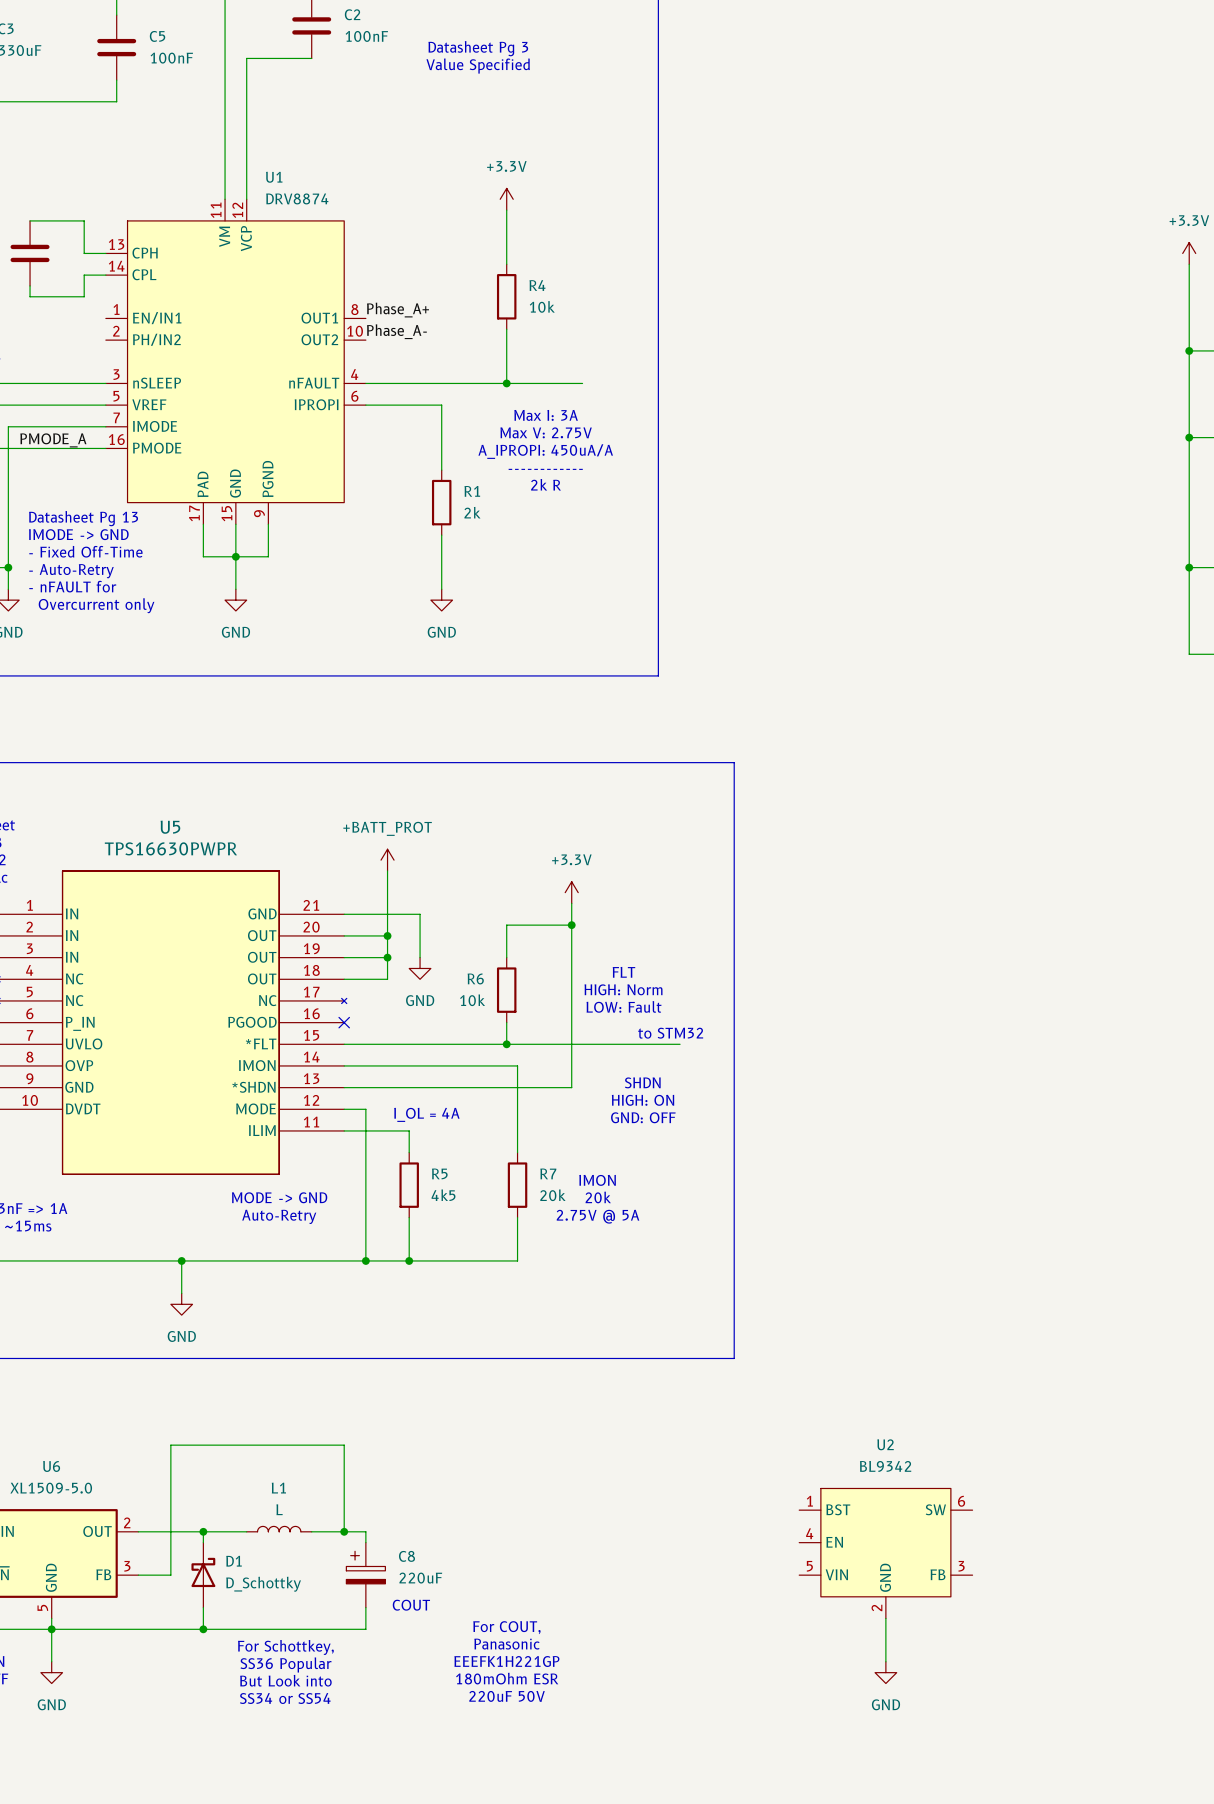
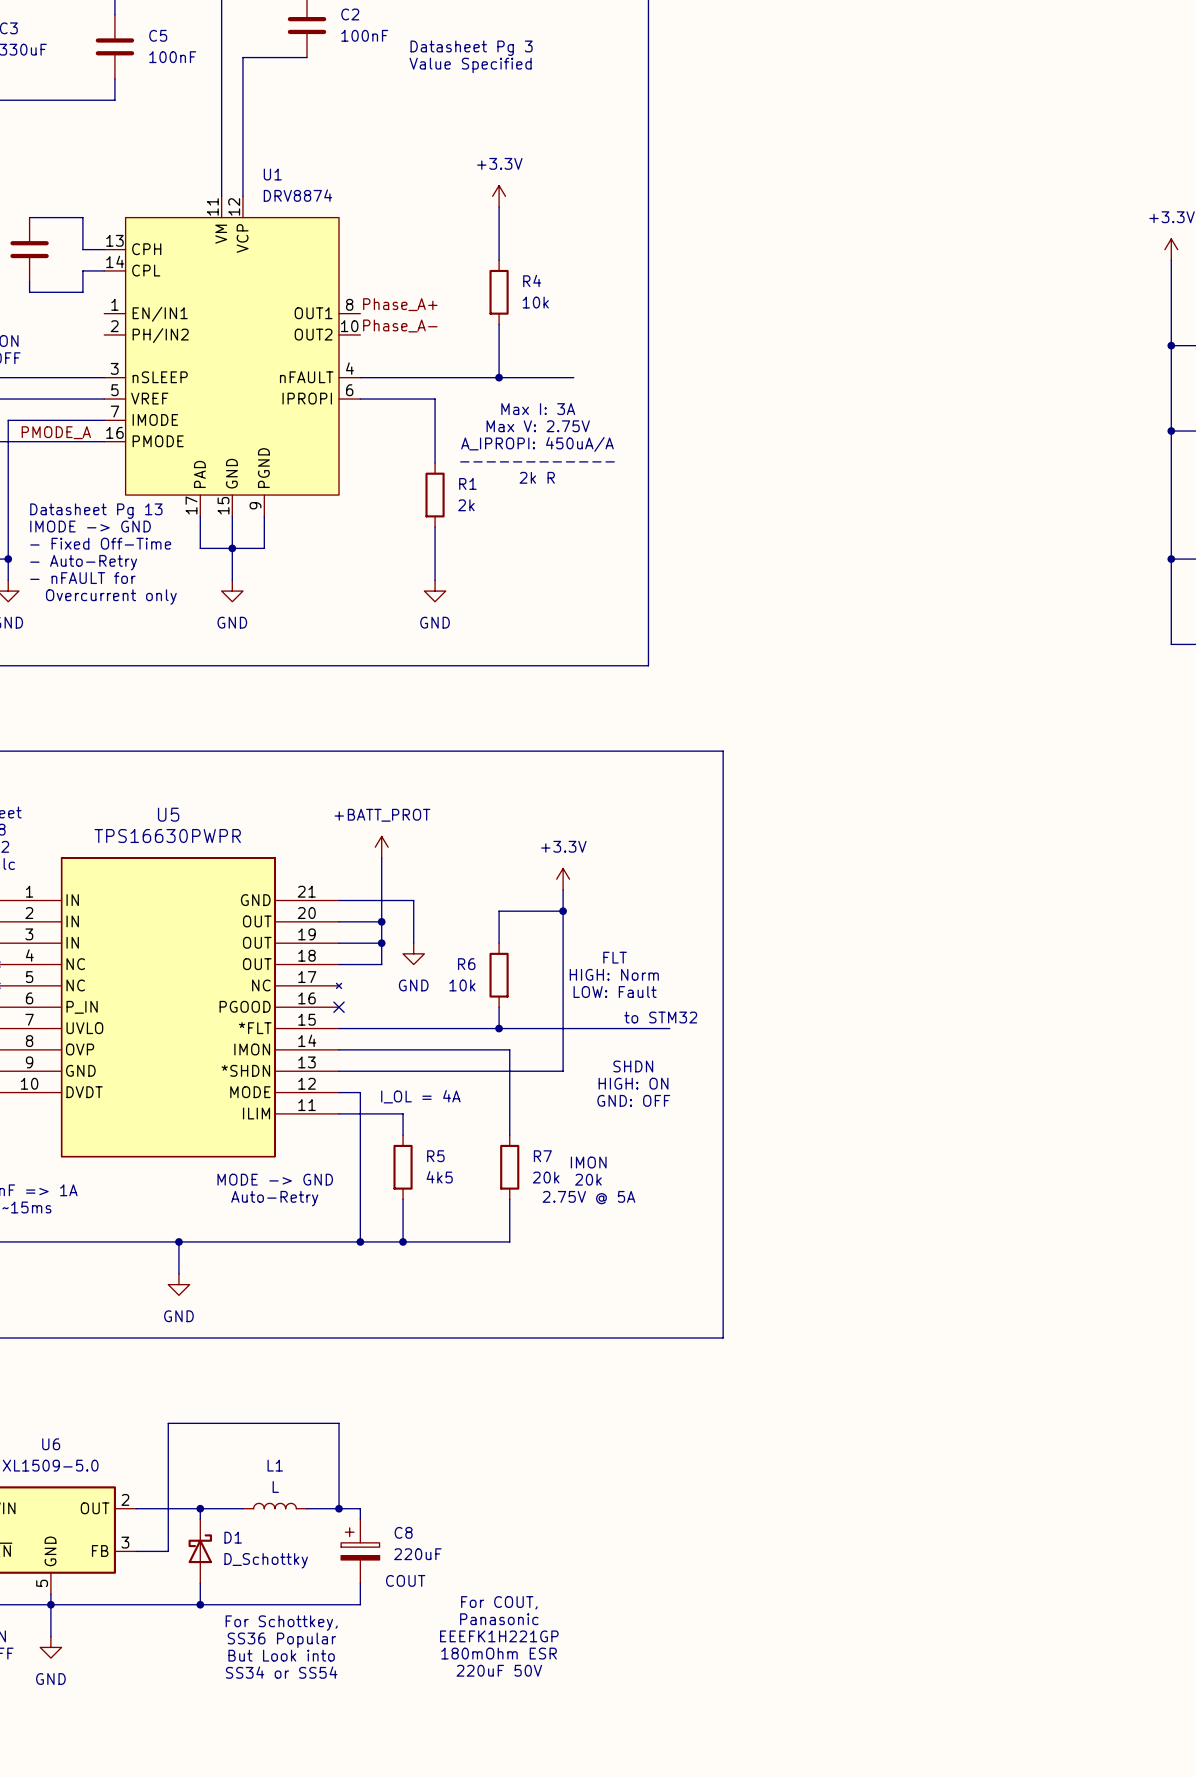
U2: BL9342 (885, 1553) -> none
wire: (885, 1618) (885, 1661) -> none
power symbol: GND (885, 1672) -> none

